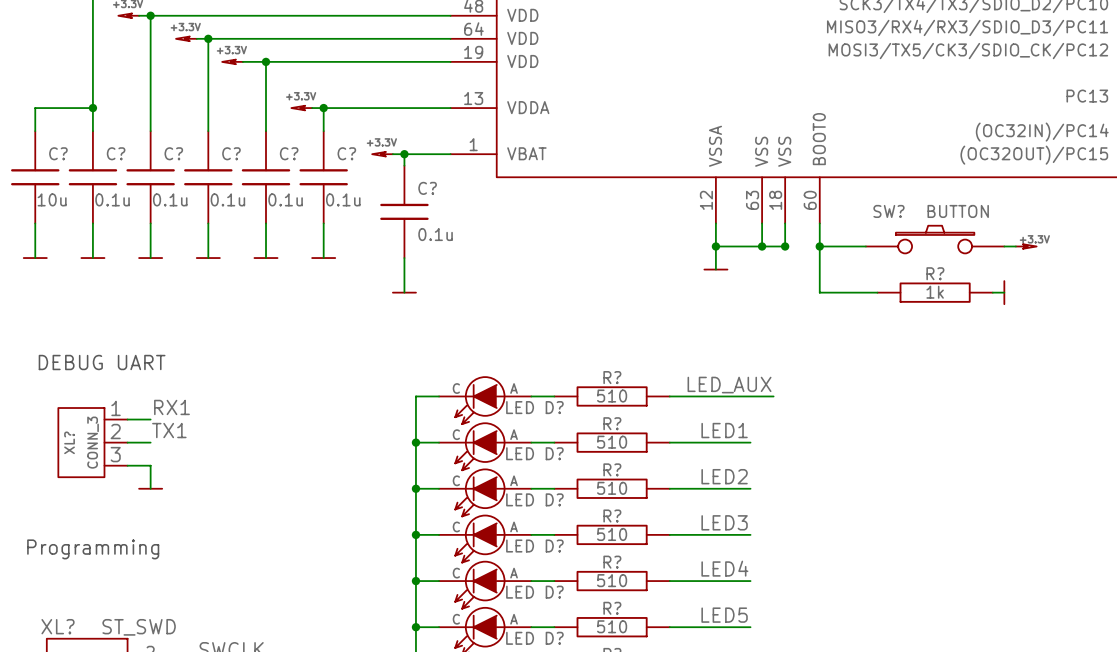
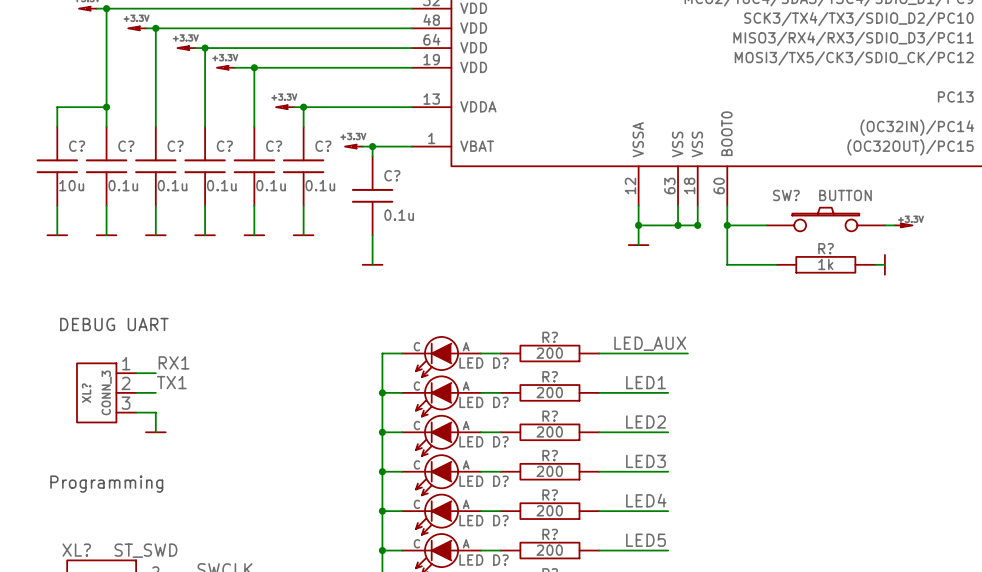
R? value: 510 (612, 396) -> 200 (549, 353)
R? value: 510 (612, 442) -> 200 (549, 392)
R? value: 510 (612, 488) -> 200 (549, 431)
R? value: 510 (612, 534) -> 200 (549, 471)
R? value: 510 (612, 580) -> 200 (549, 510)
R? value: 510 (612, 626) -> 200 (549, 550)

